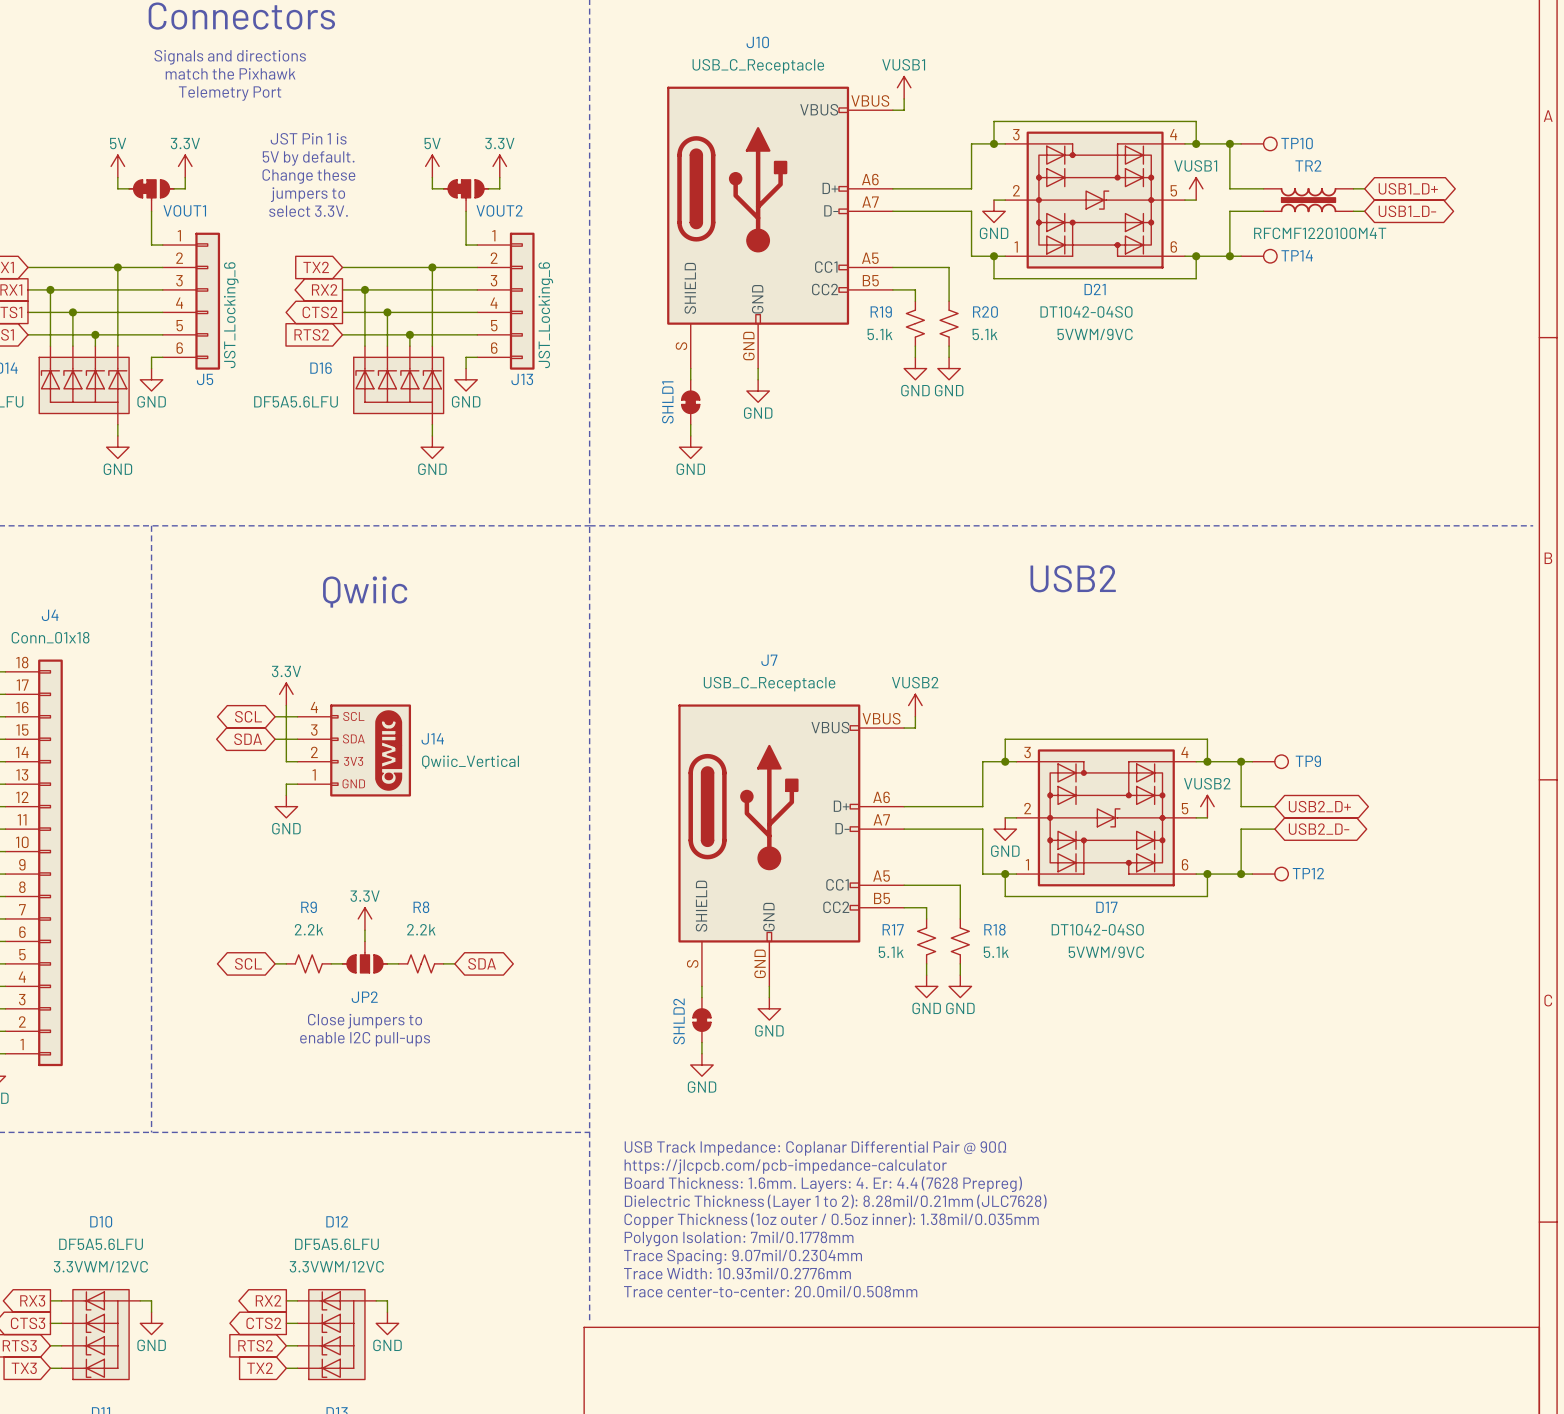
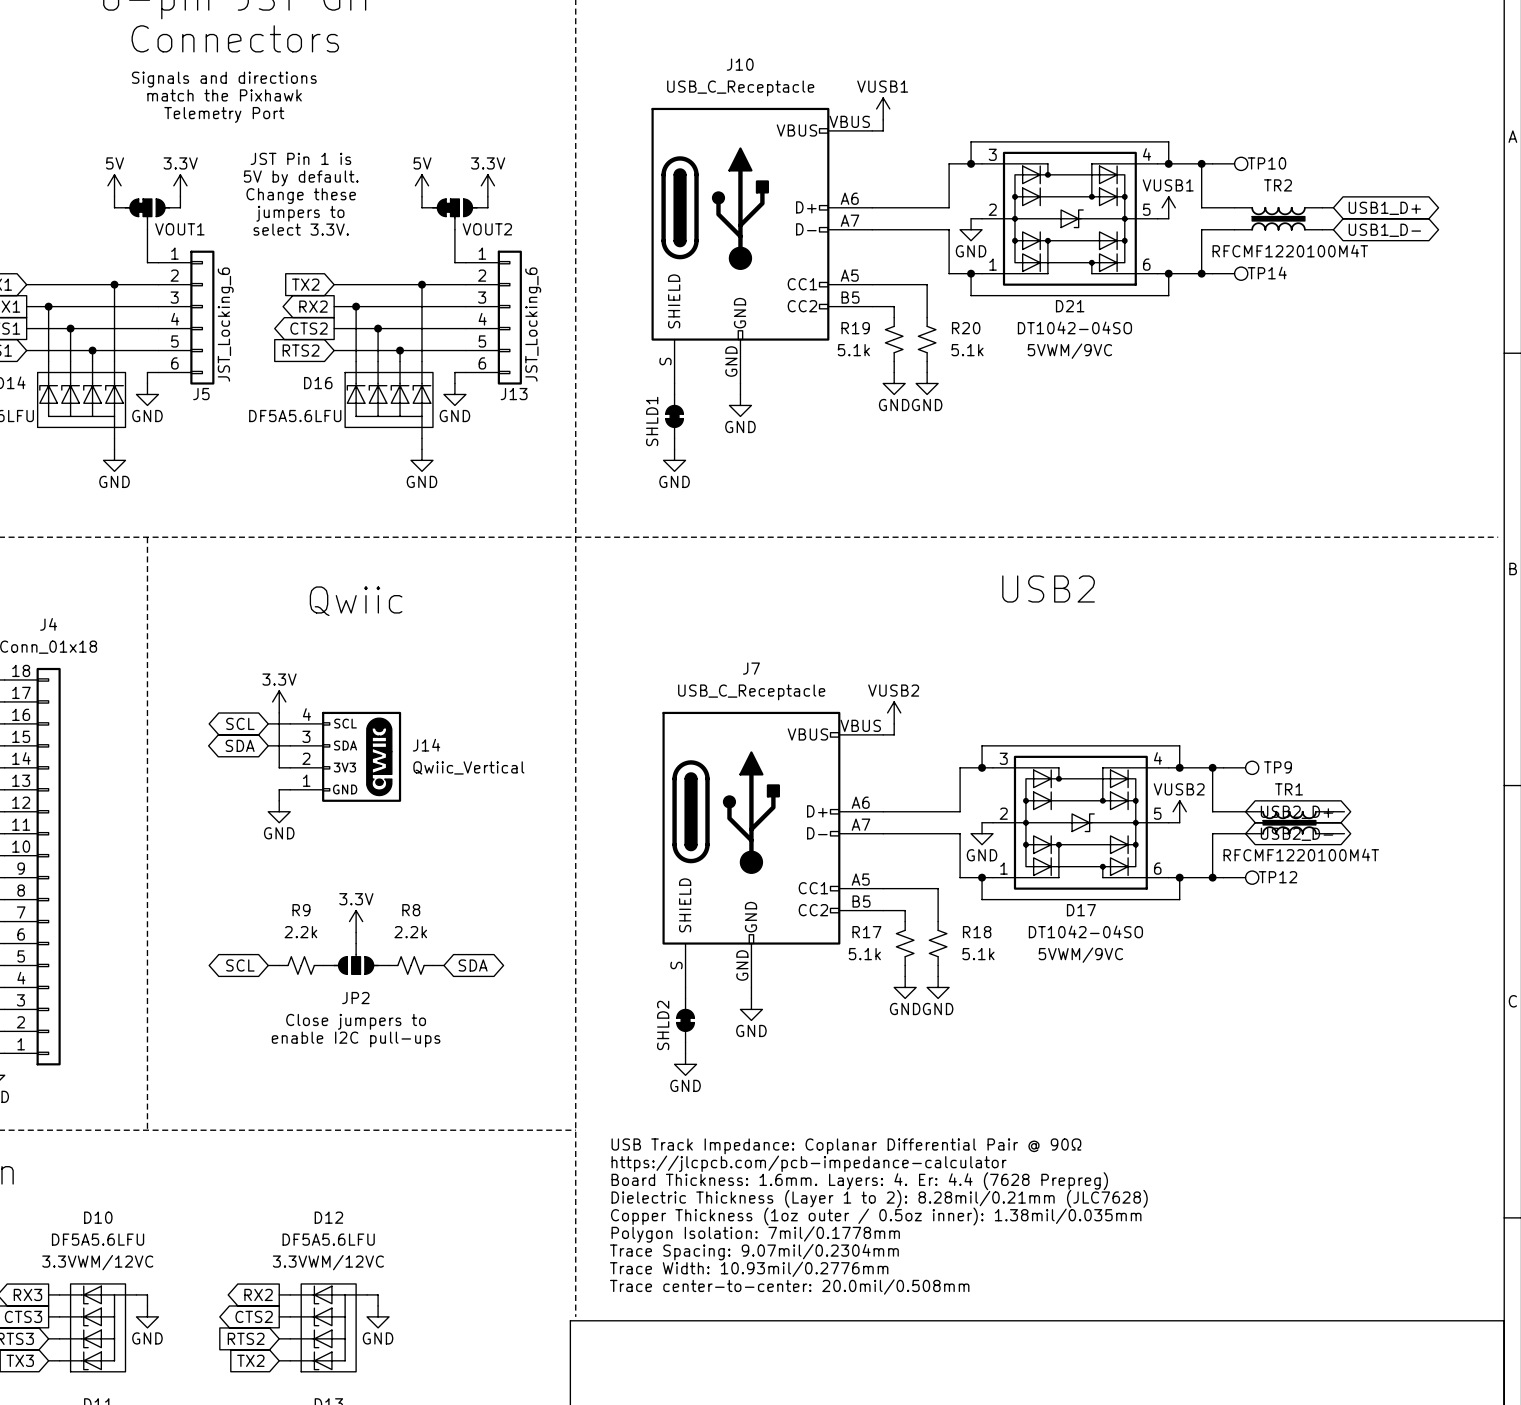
wire: none -> (1333, 811) (1344, 811)
TR1: none -> RFCMF1220100M4T (1289, 822)
wire: none -> (1333, 833) (1344, 833)

